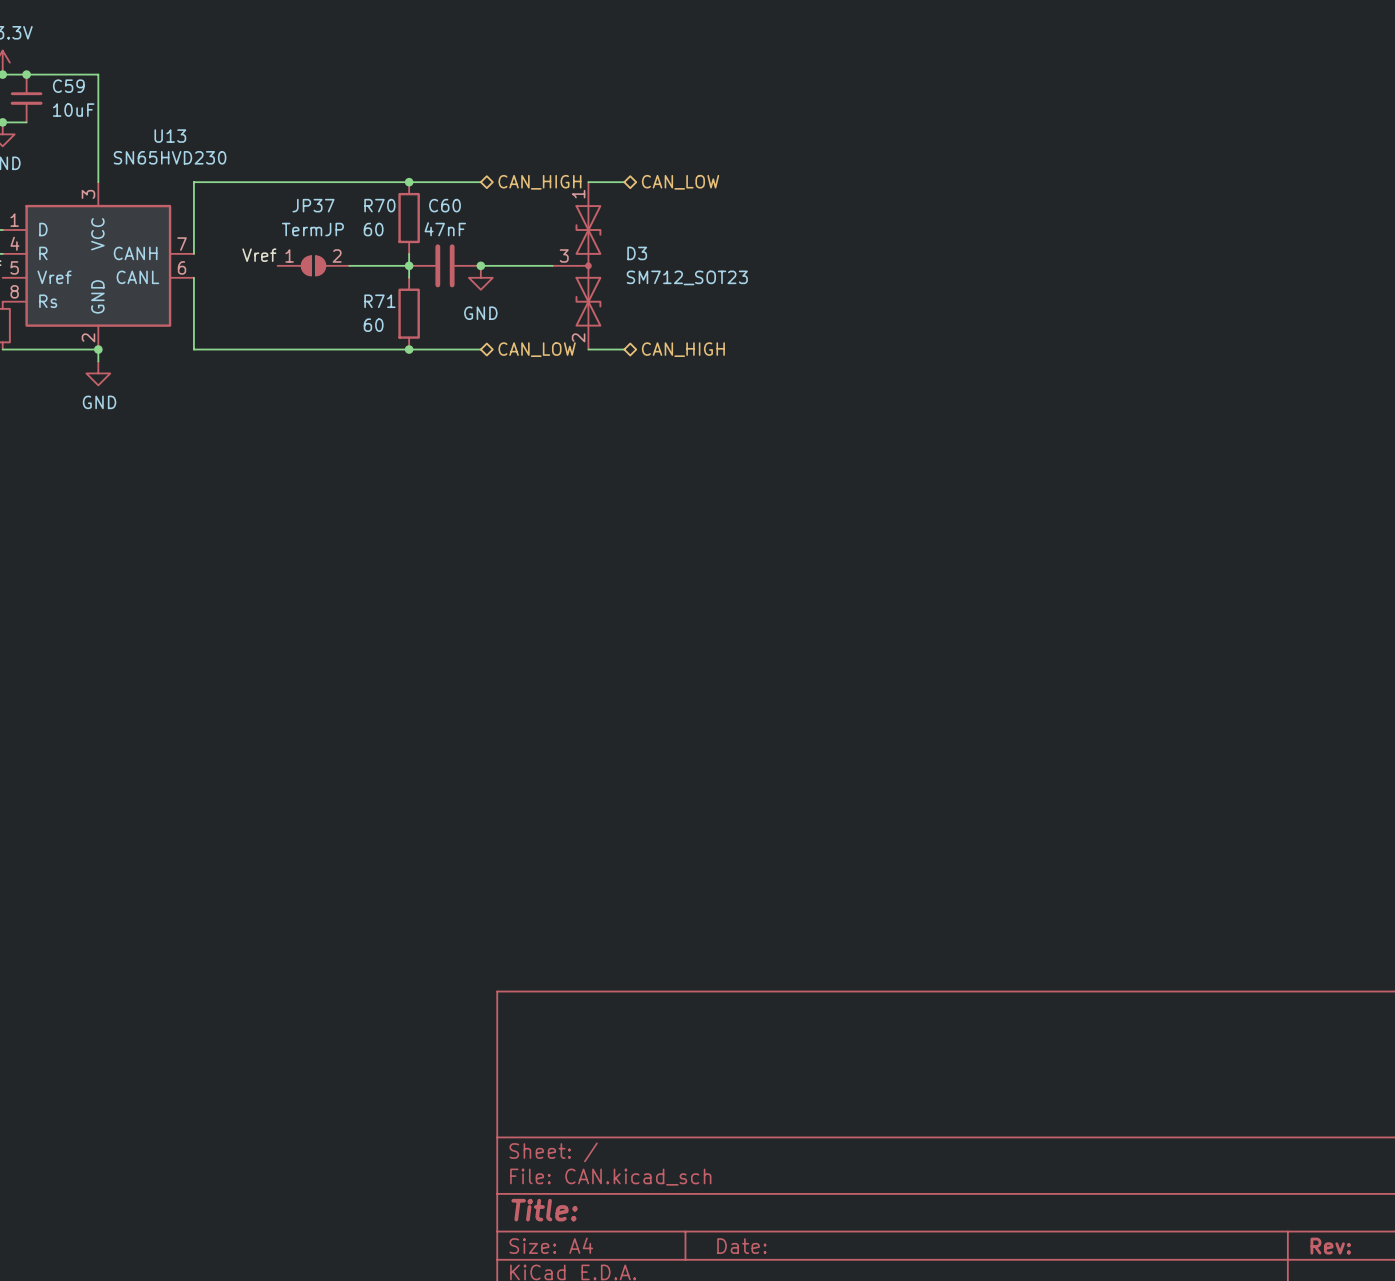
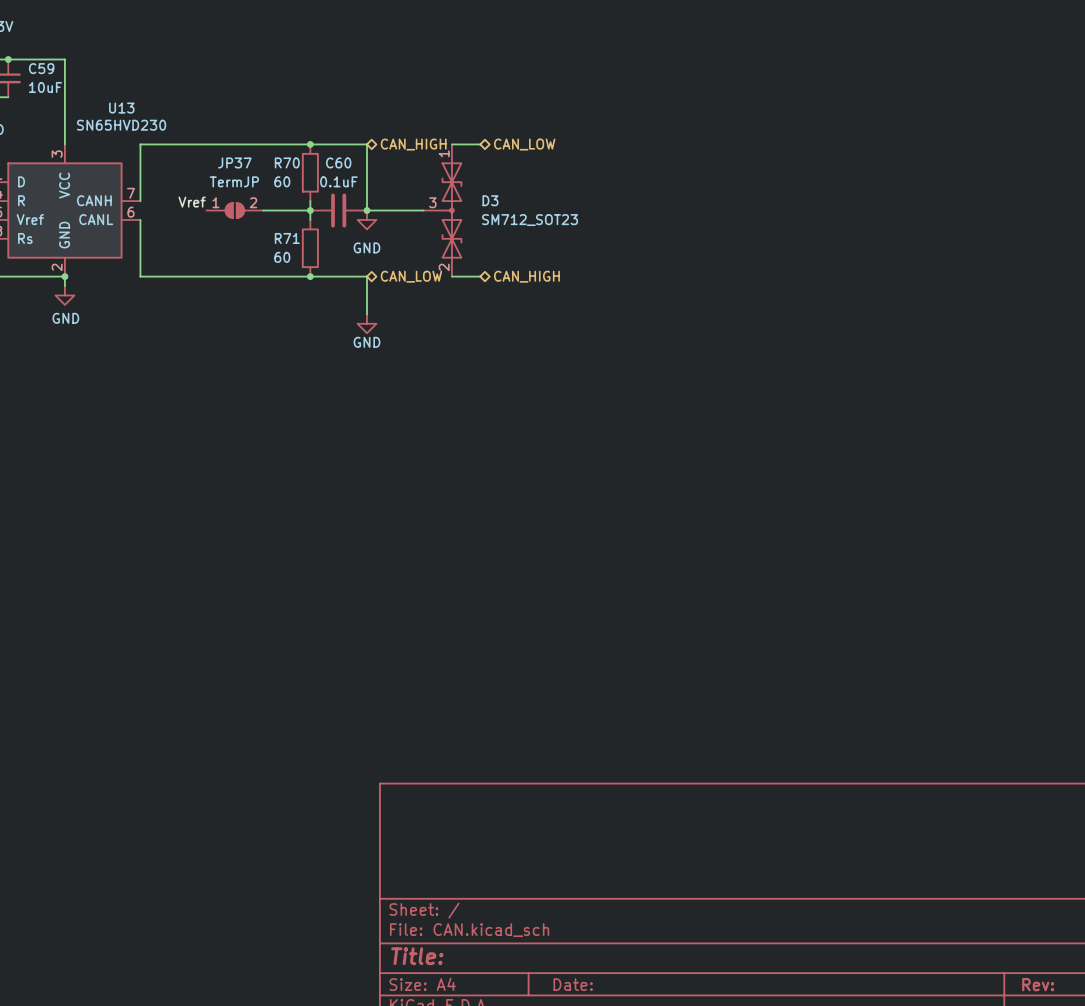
wire: none -> (366, 144) (366, 210)
C60 value: 47nF (445, 229) -> 0.1uF (338, 181)
wire: none -> (366, 276) (366, 314)
power symbol: none -> GND (366, 323)

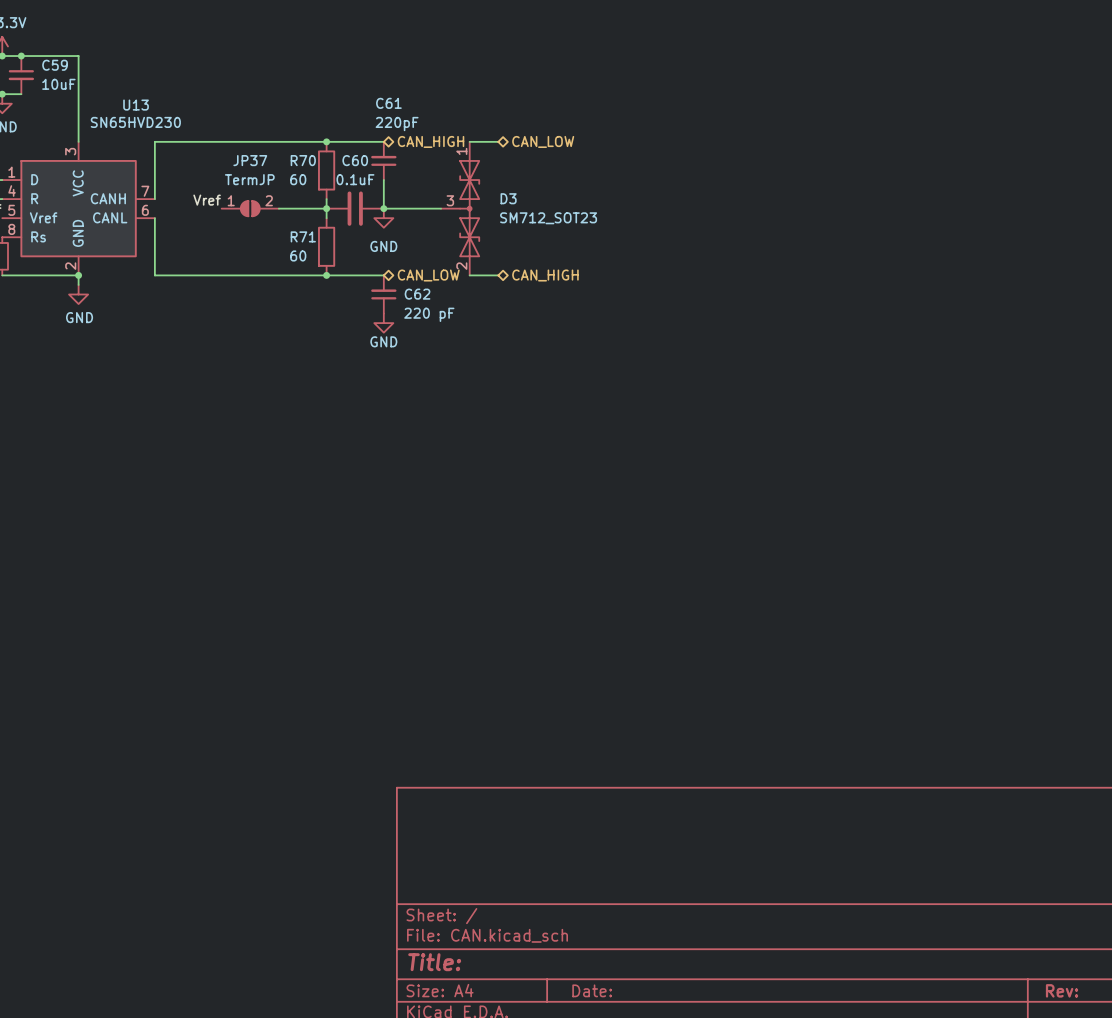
C61: none -> 220pF (383, 160)
C62: none -> 220 pF (383, 294)

